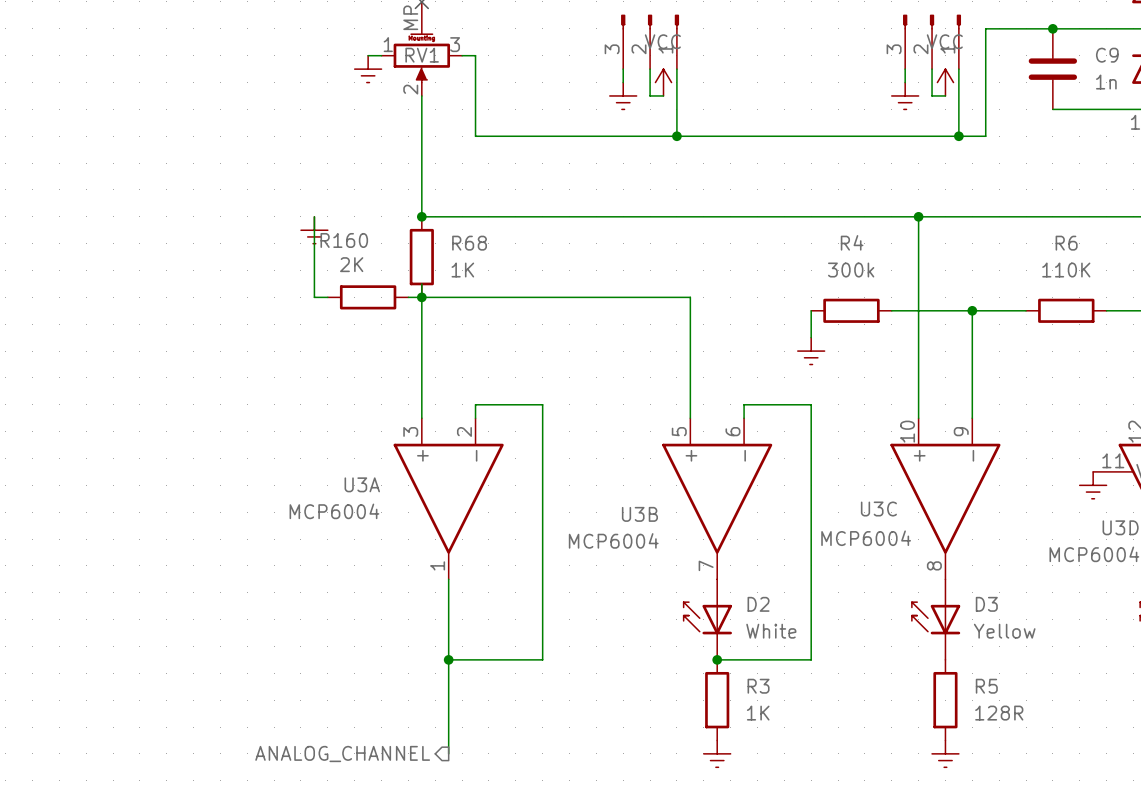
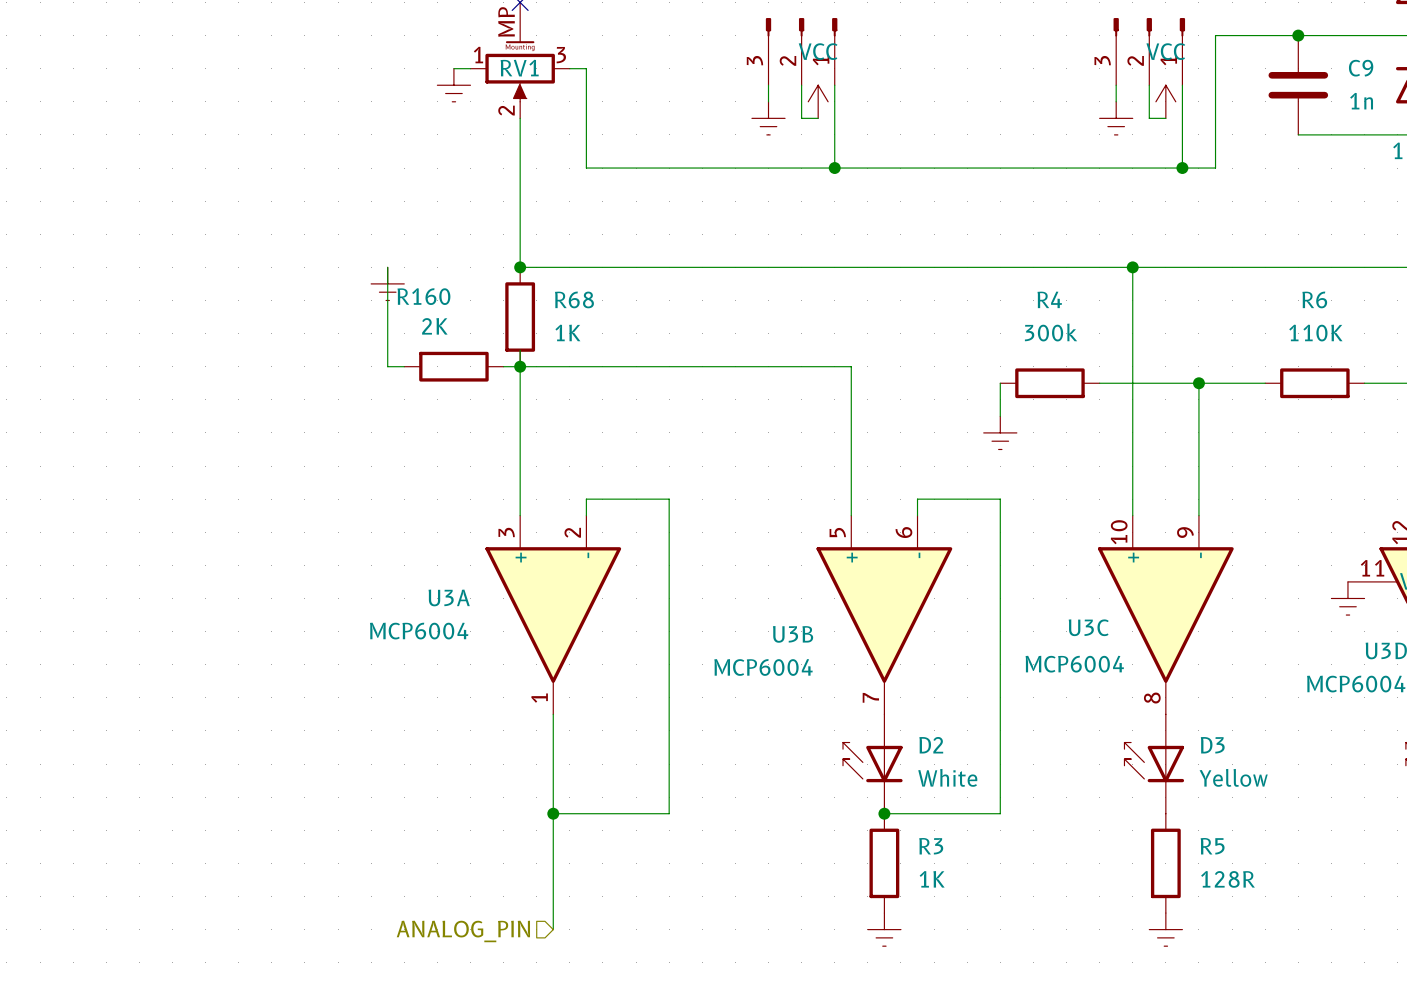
hierarchical label shape: output (342, 754) -> input (463, 931)
hierarchical label: ANALOG_CHANNEL (342, 754) -> ANALOG_PIN (463, 931)

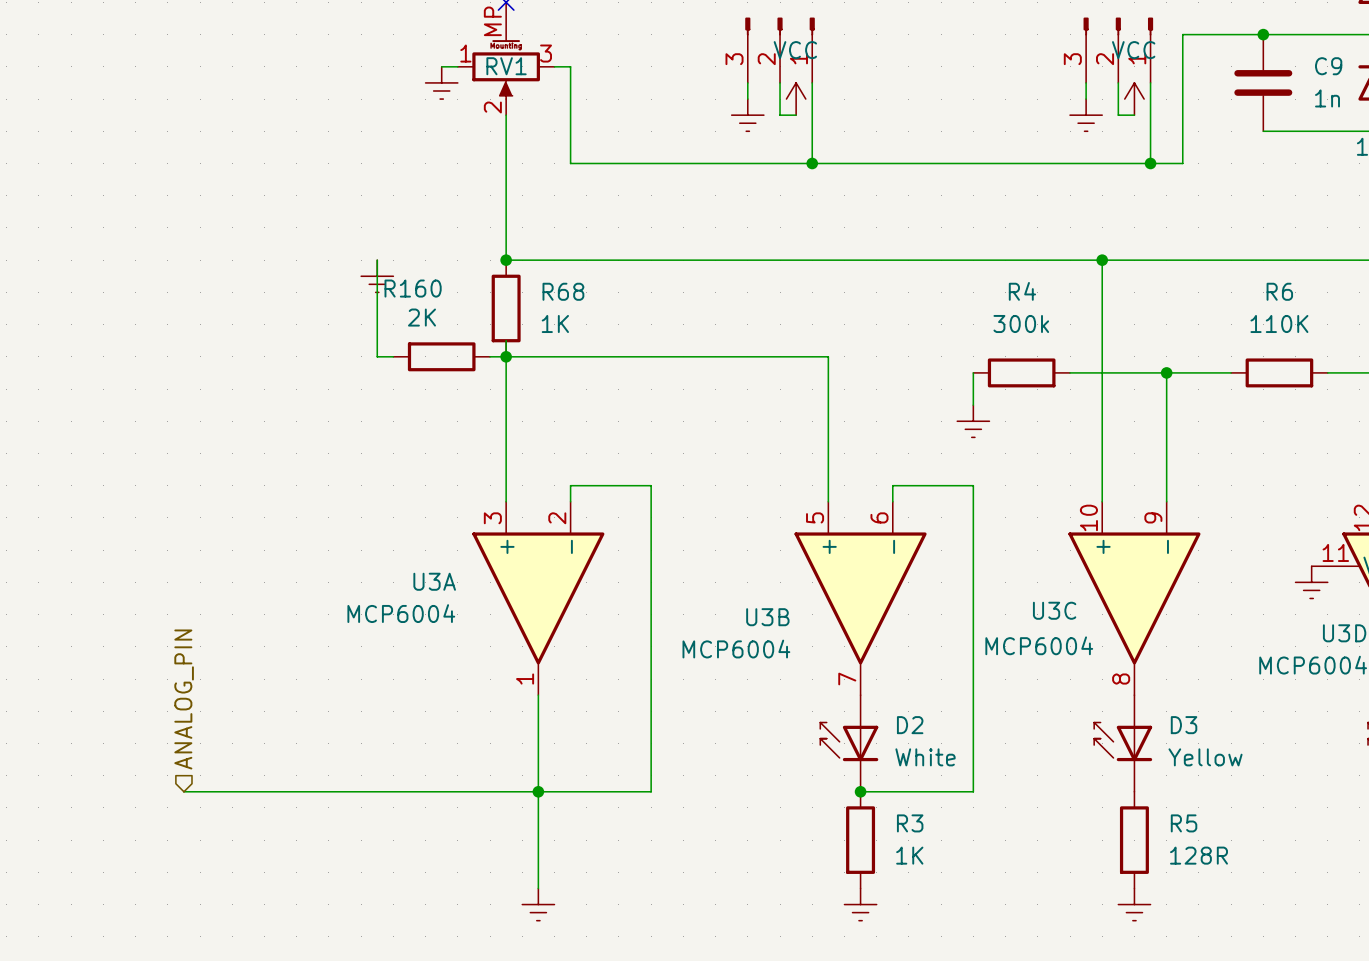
hierarchical label: none -> ANALOG_PIN (184, 699)
wire: none -> (183, 791) (538, 791)
power symbol: none -> (538, 904)
hierarchical label: ANALOG_PIN (463, 931) -> none

